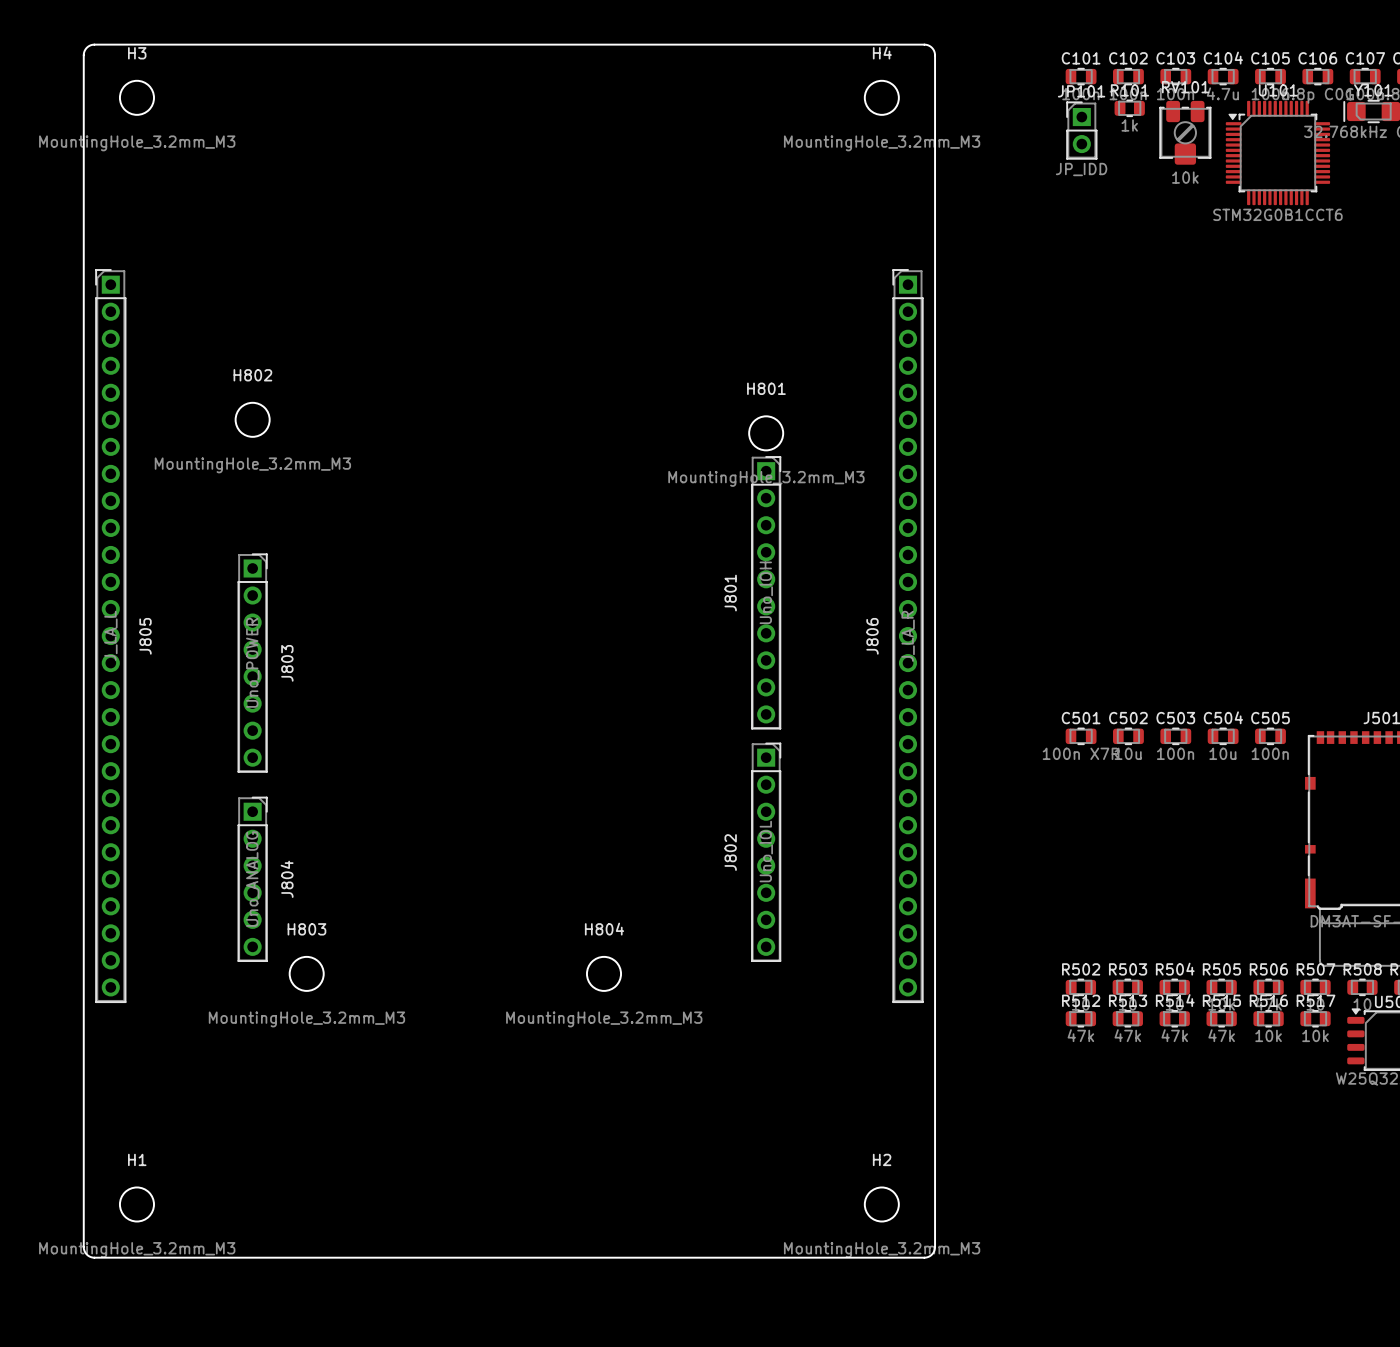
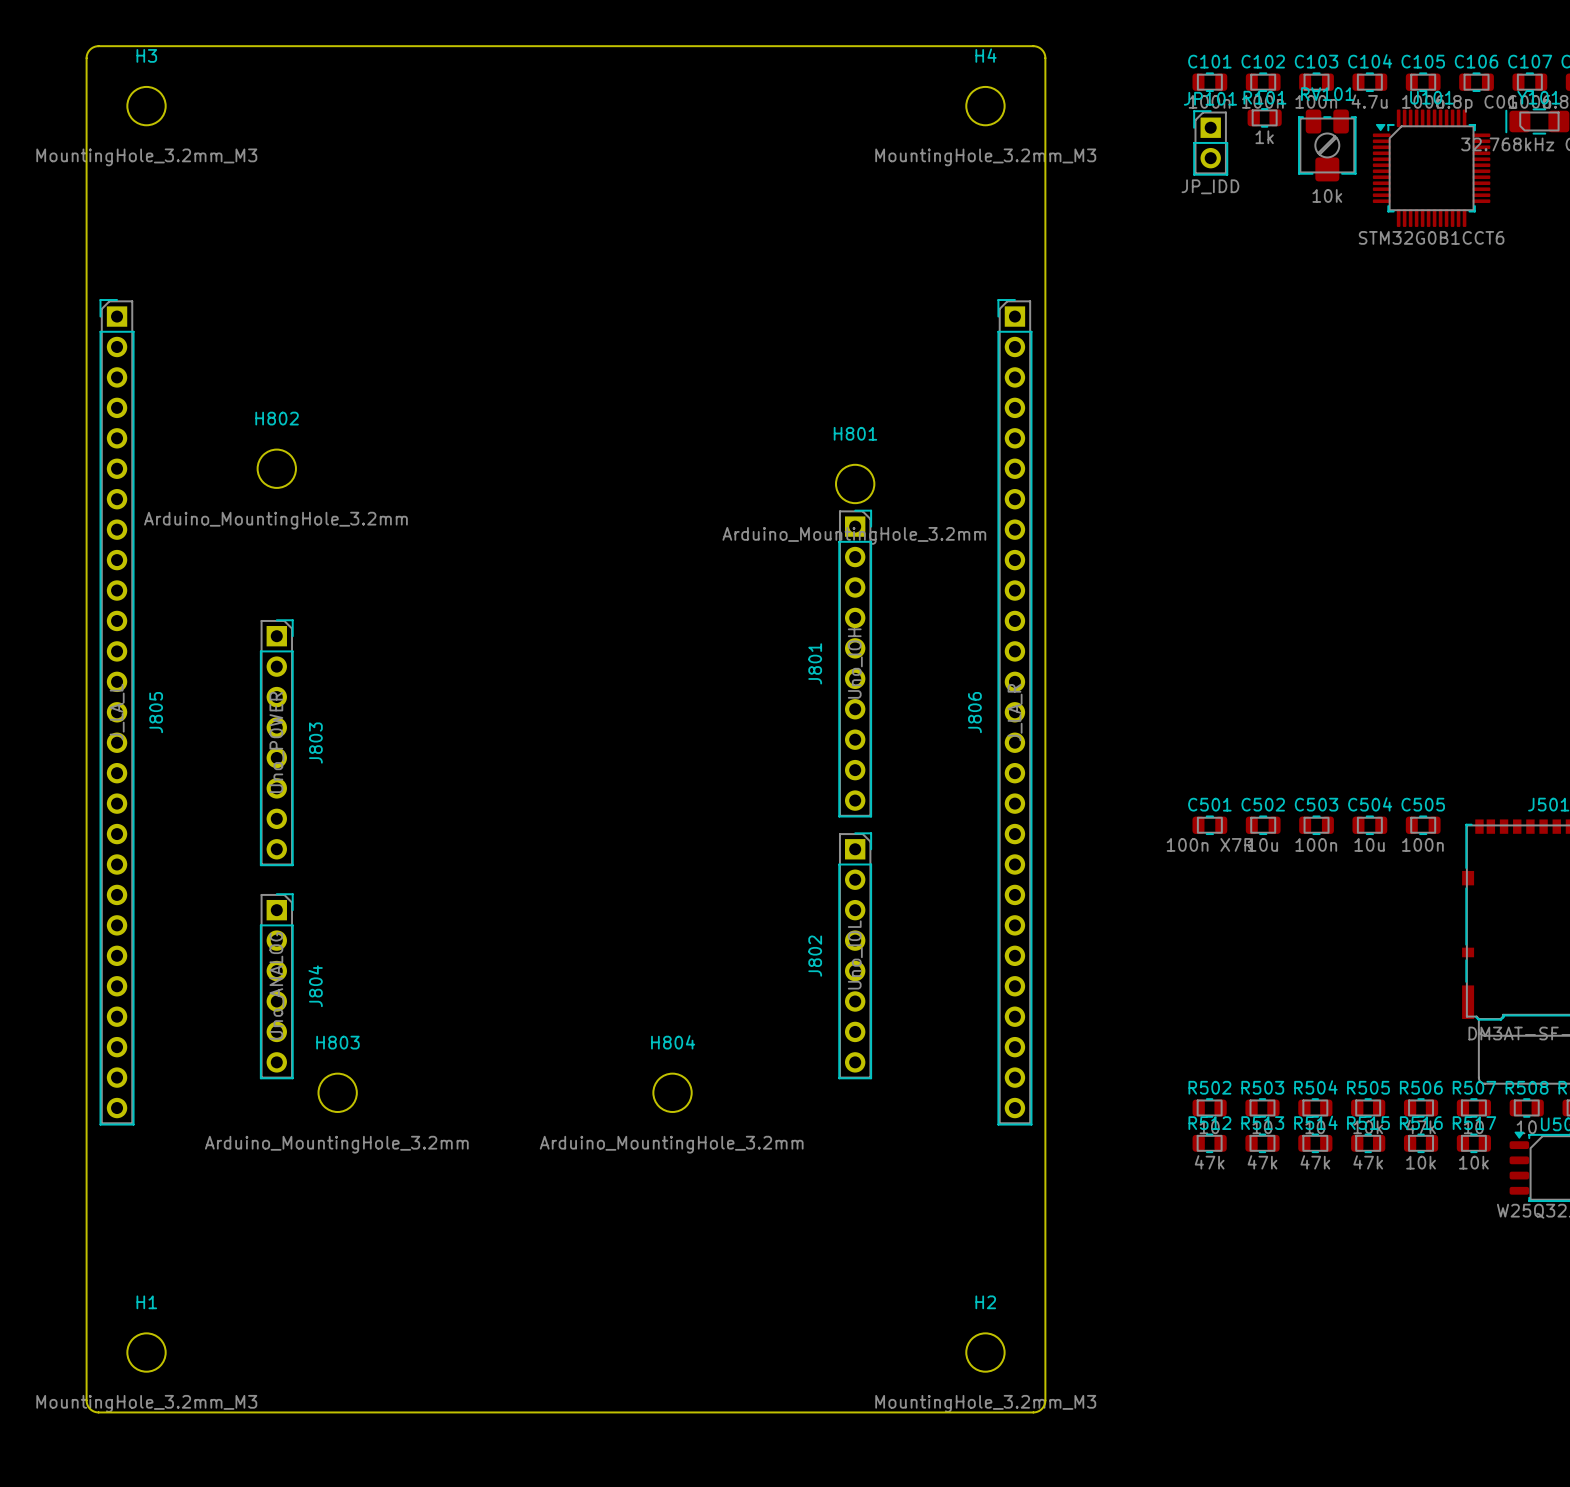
H802 value: MountingHole_3.2mm_M3 (252, 465) -> Arduino_MountingHole_3.2mm (275, 520)
H801 value: MountingHole_3.2mm_M3 (766, 478) -> Arduino_MountingHole_3.2mm (854, 535)
H803 value: MountingHole_3.2mm_M3 (306, 1019) -> Arduino_MountingHole_3.2mm (336, 1144)
H804 value: MountingHole_3.2mm_M3 (604, 1019) -> Arduino_MountingHole_3.2mm (671, 1144)

